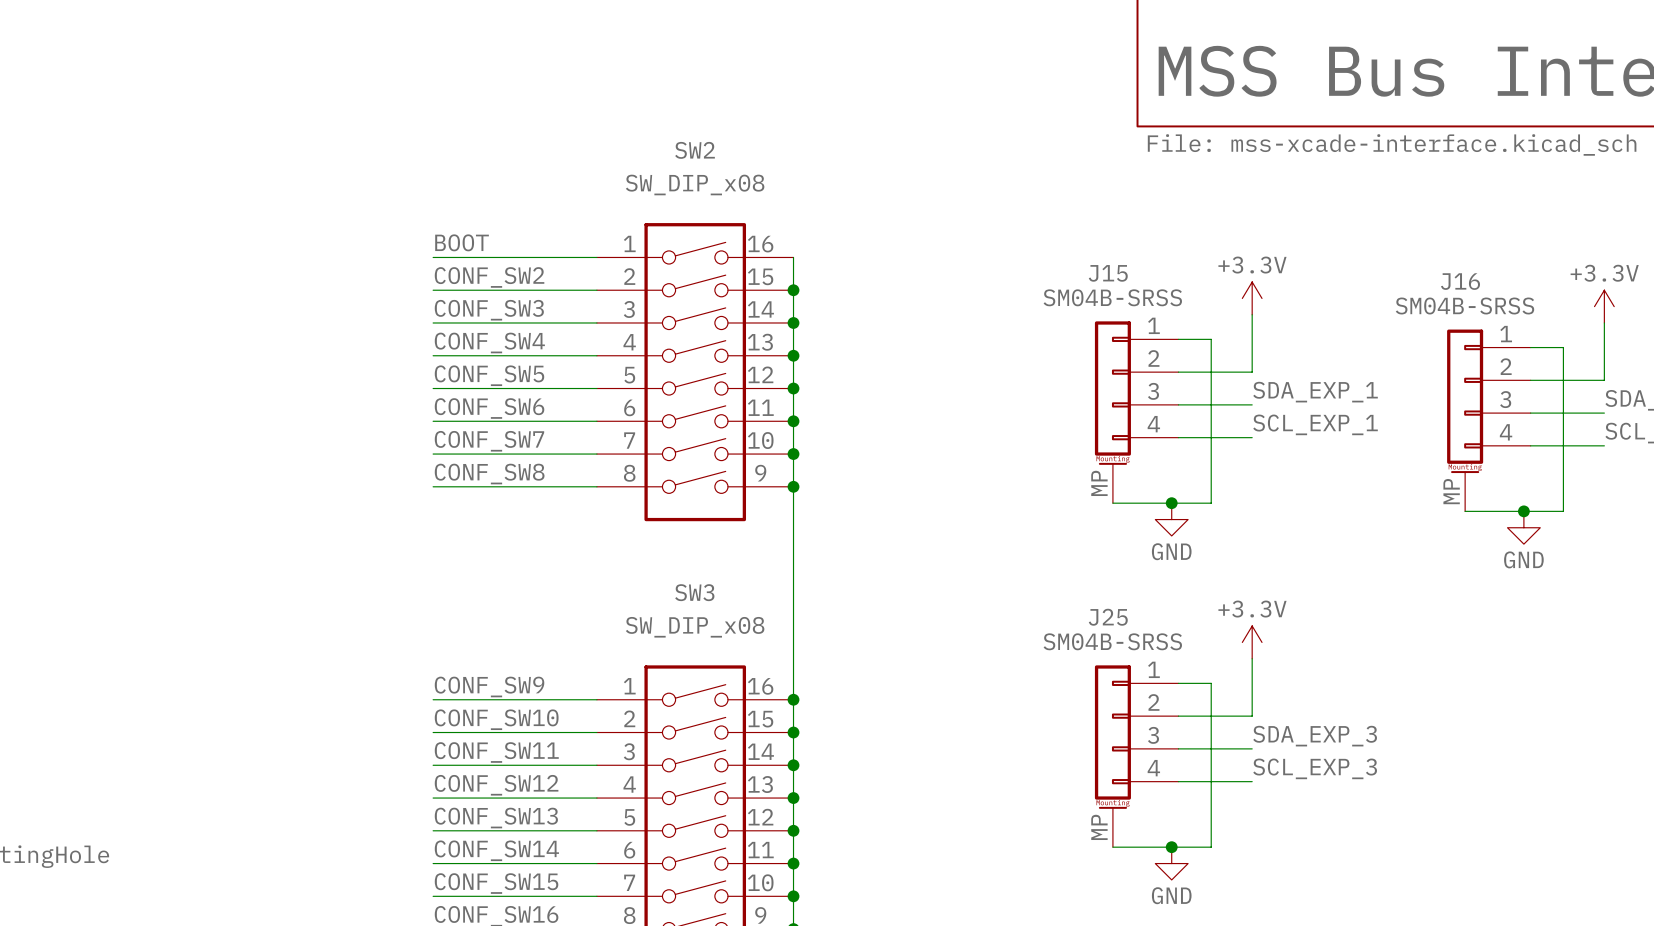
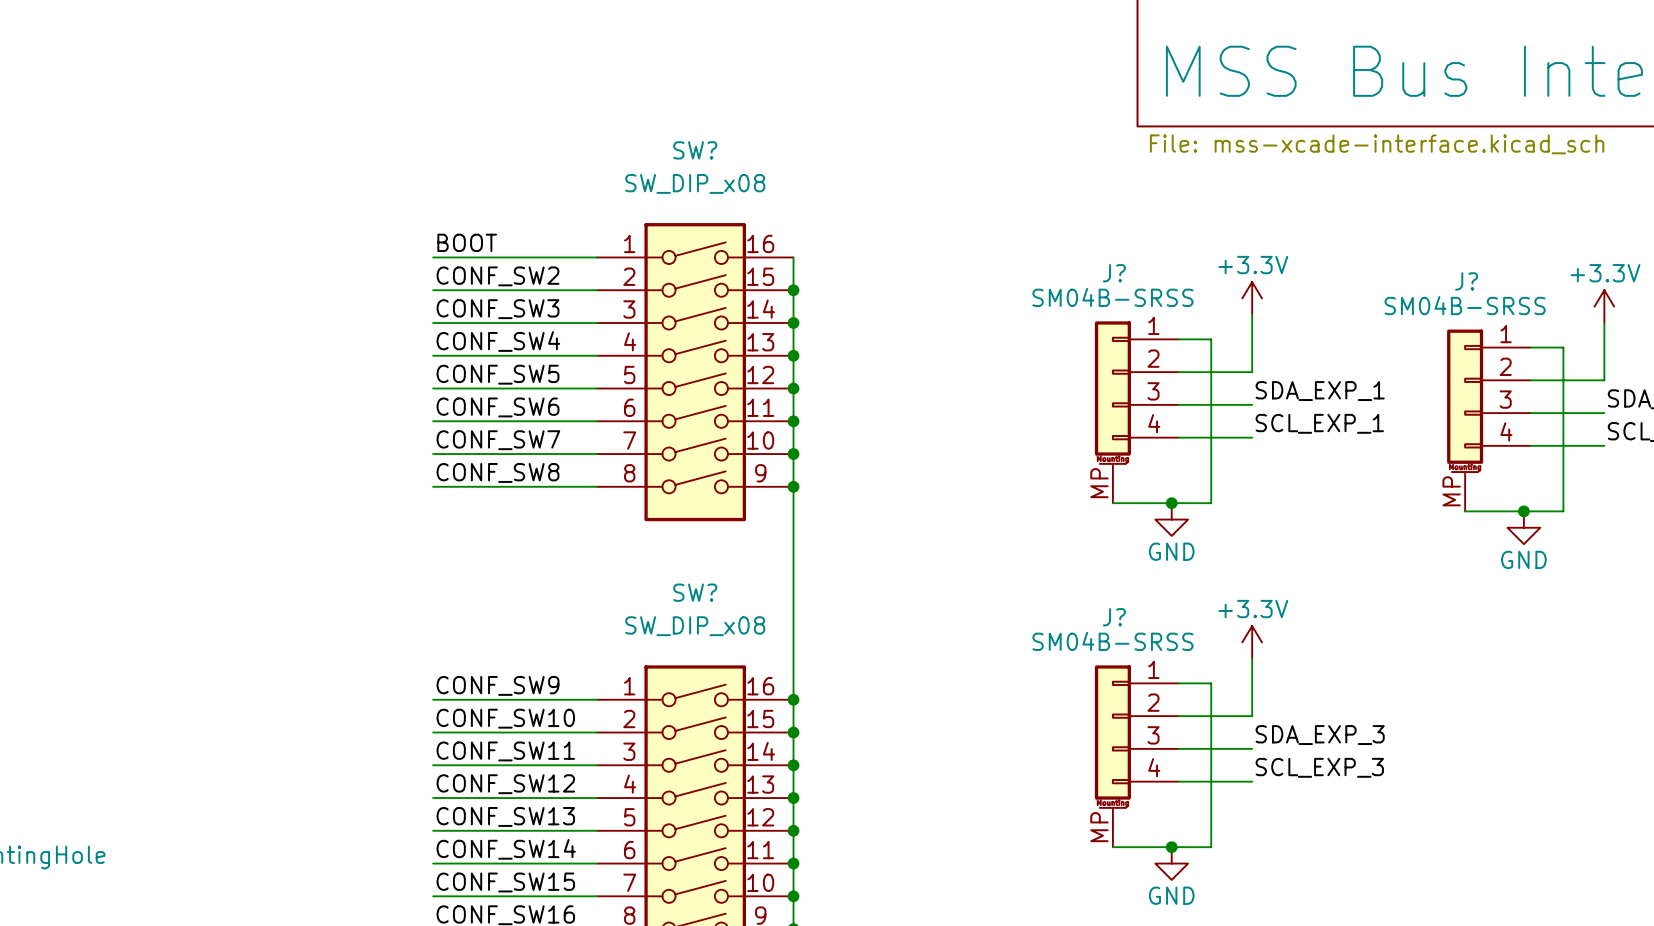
SW2 name: SW2 (695, 150) -> SW? (695, 150)
J15 name: J15 (1108, 273) -> J? (1114, 273)
J16 name: J16 (1460, 281) -> J? (1466, 281)
SW3 name: SW3 (694, 592) -> SW? (695, 592)
J25 name: J25 (1108, 617) -> J? (1114, 617)

